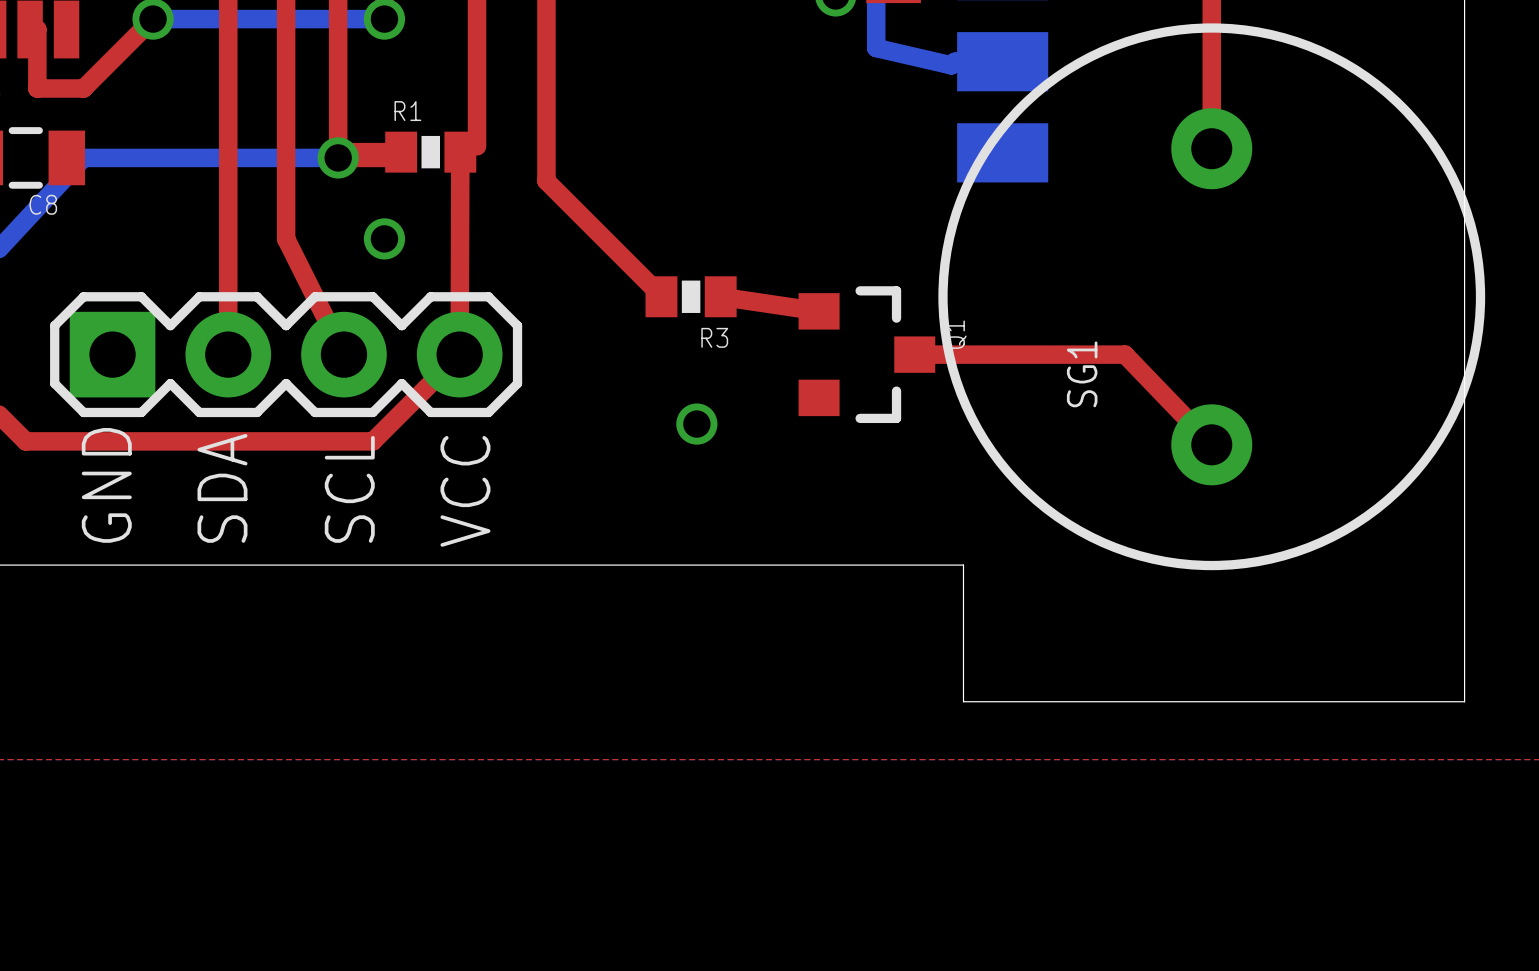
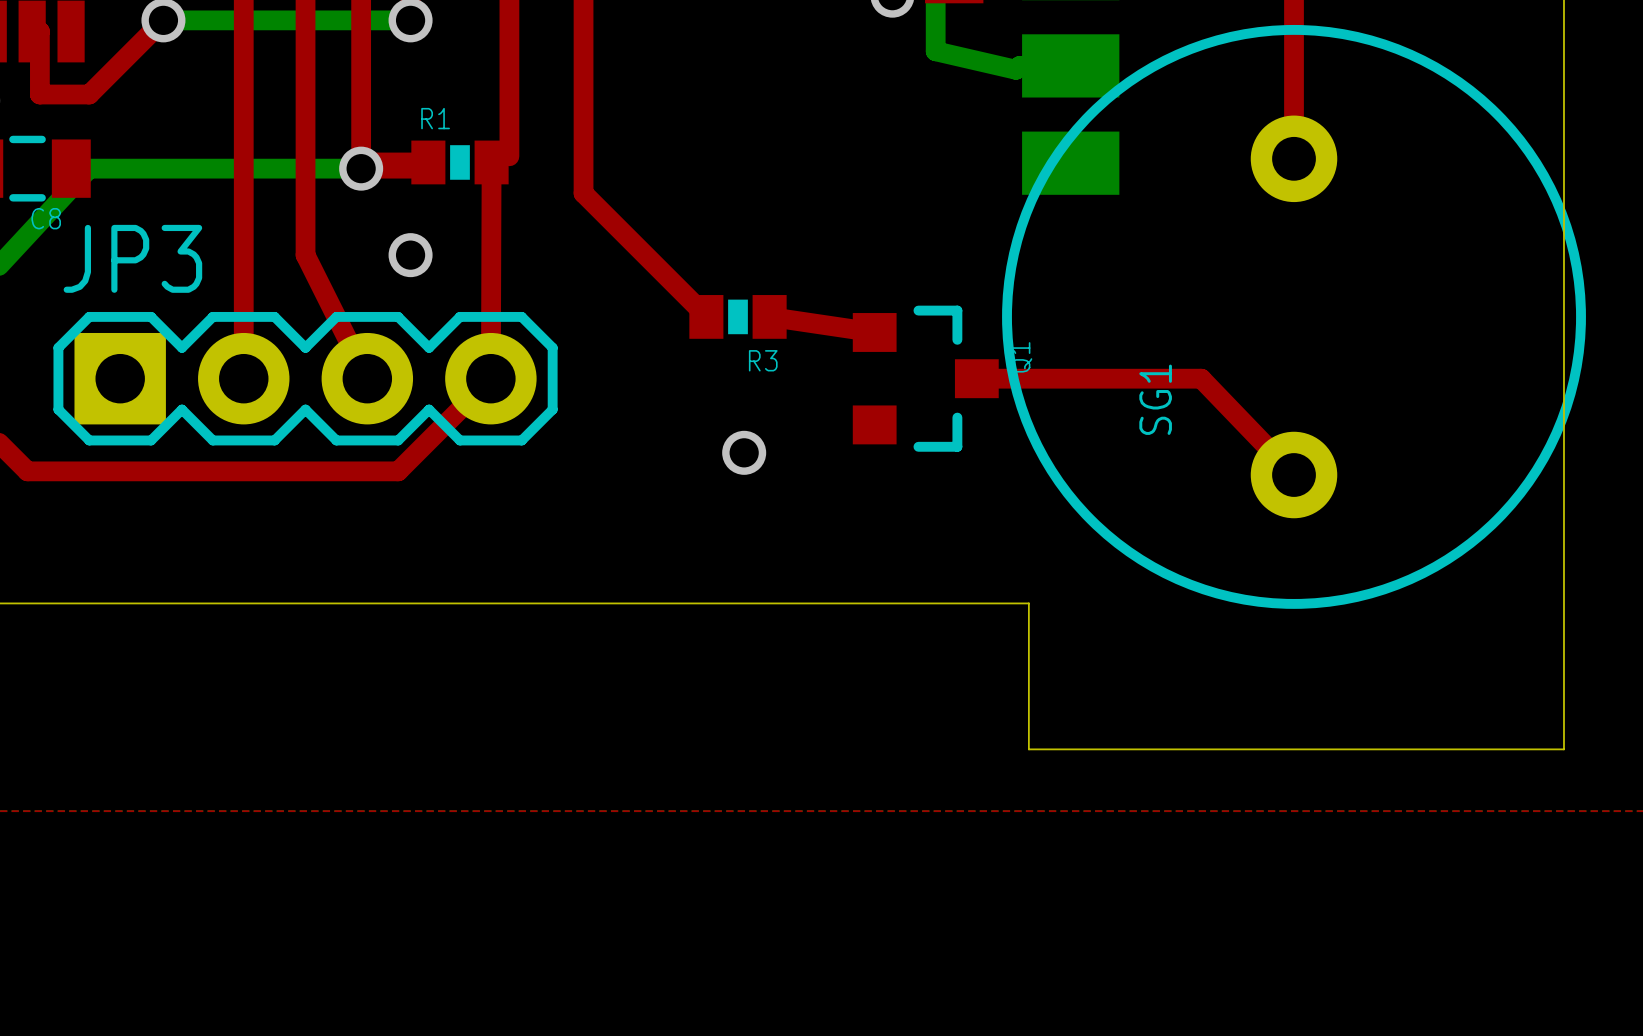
JP3 name: none -> JP3 (132, 258)
text: GND (106, 485) -> none
text: SDA (222, 488) -> none
text: SCL (349, 489) -> none
text: VCC (465, 491) -> none

